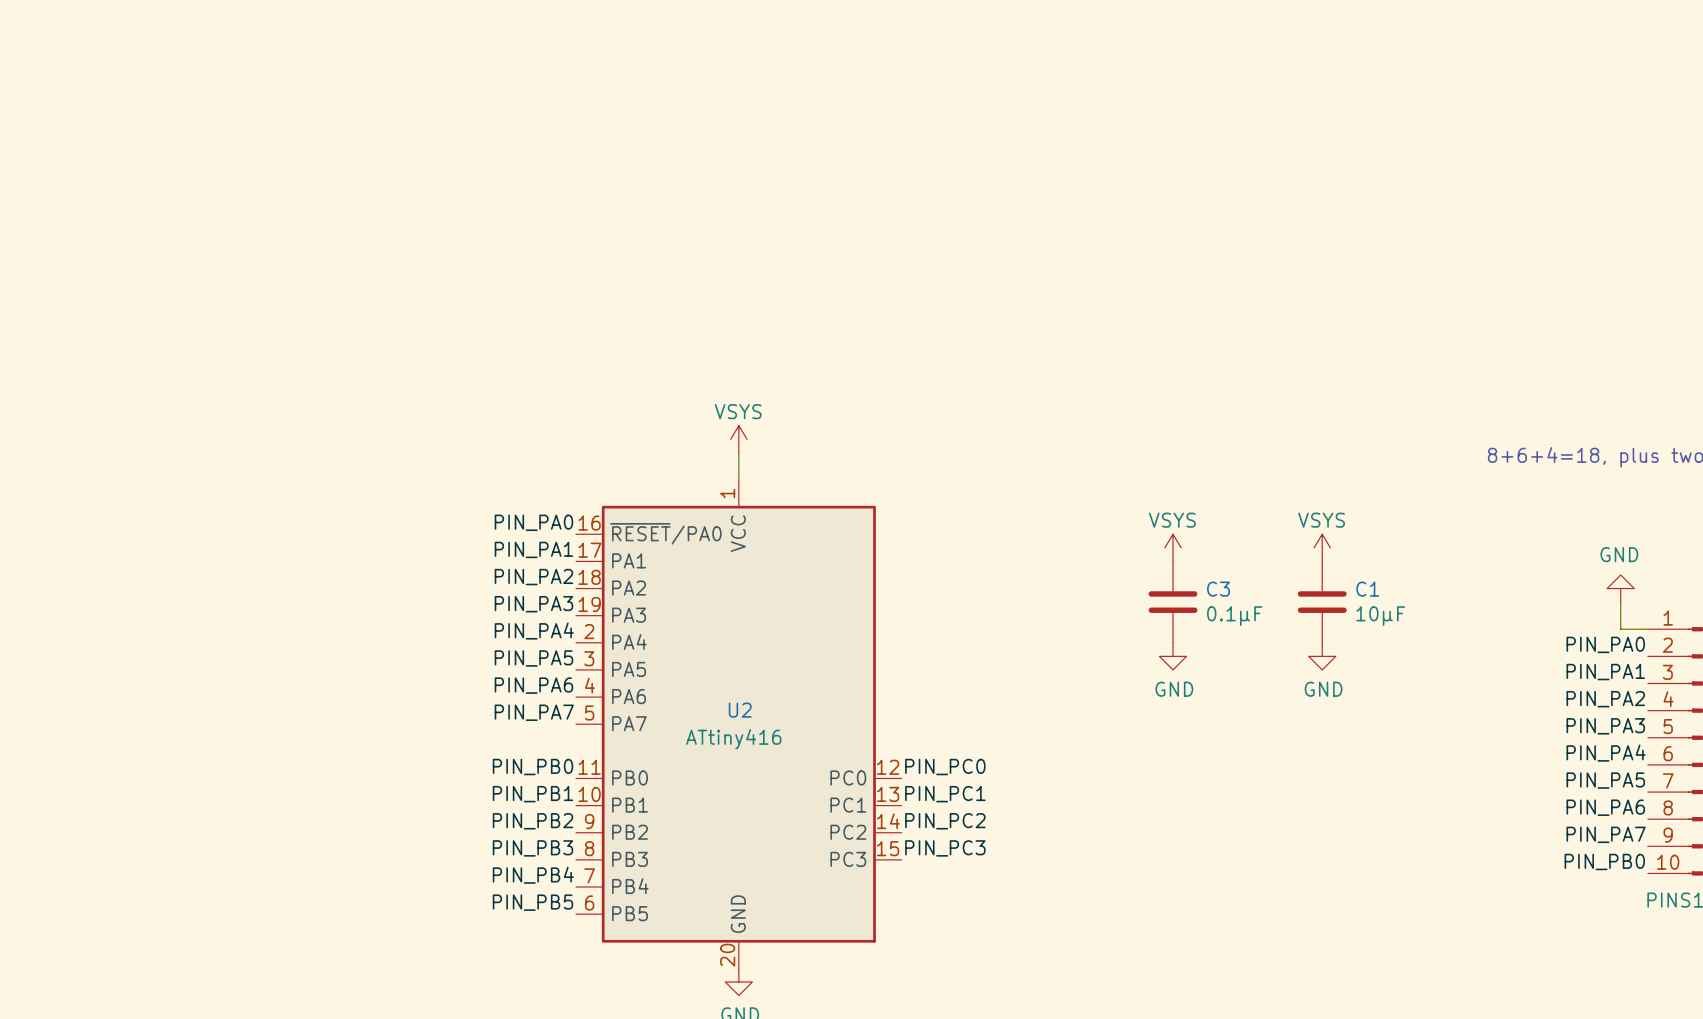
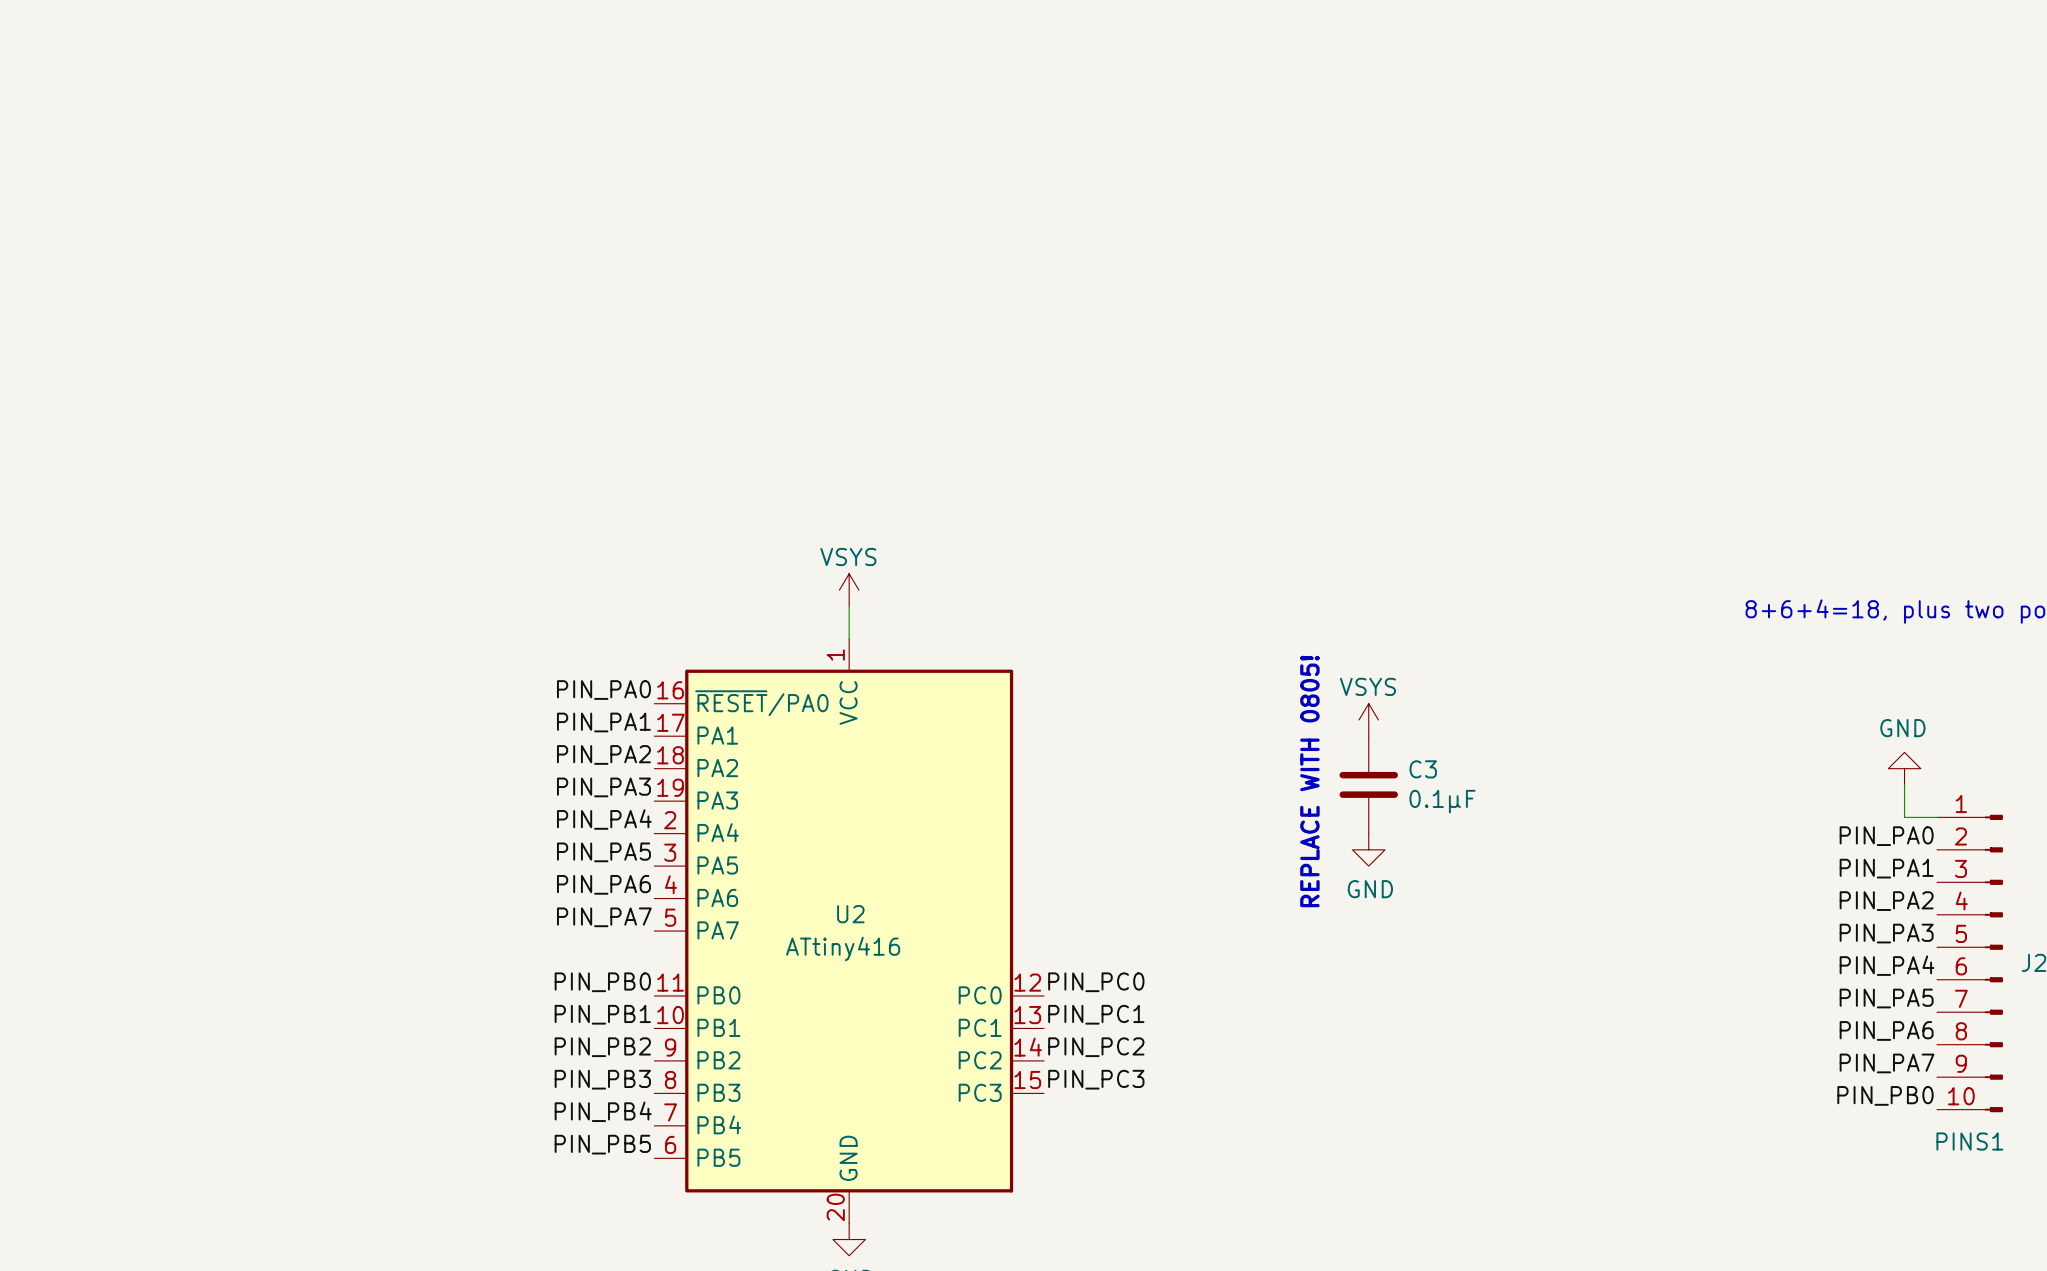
power symbol: VSYS (1322, 547) -> none
text: none -> REPLACE WITH 0805! (1309, 781)
C1: 10μF (1322, 602) -> none
power symbol: GND (1322, 656) -> none

